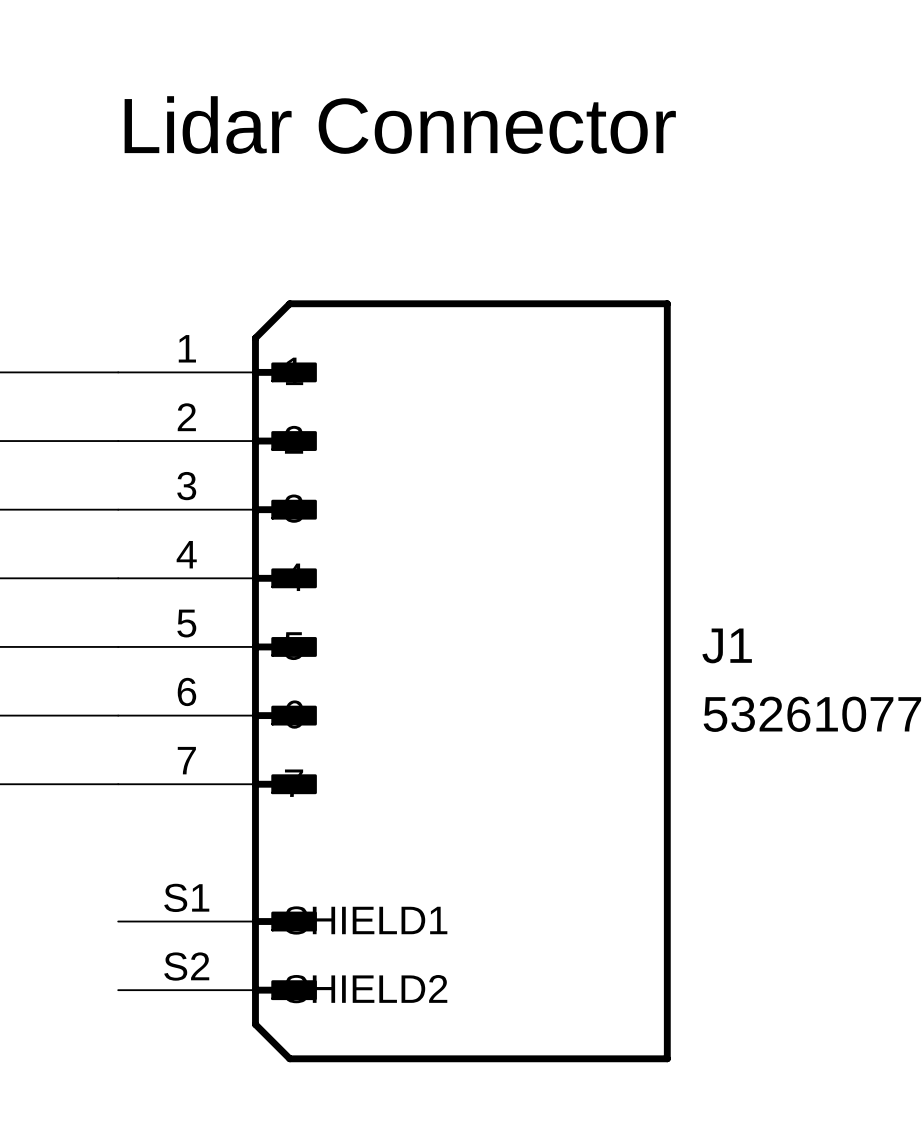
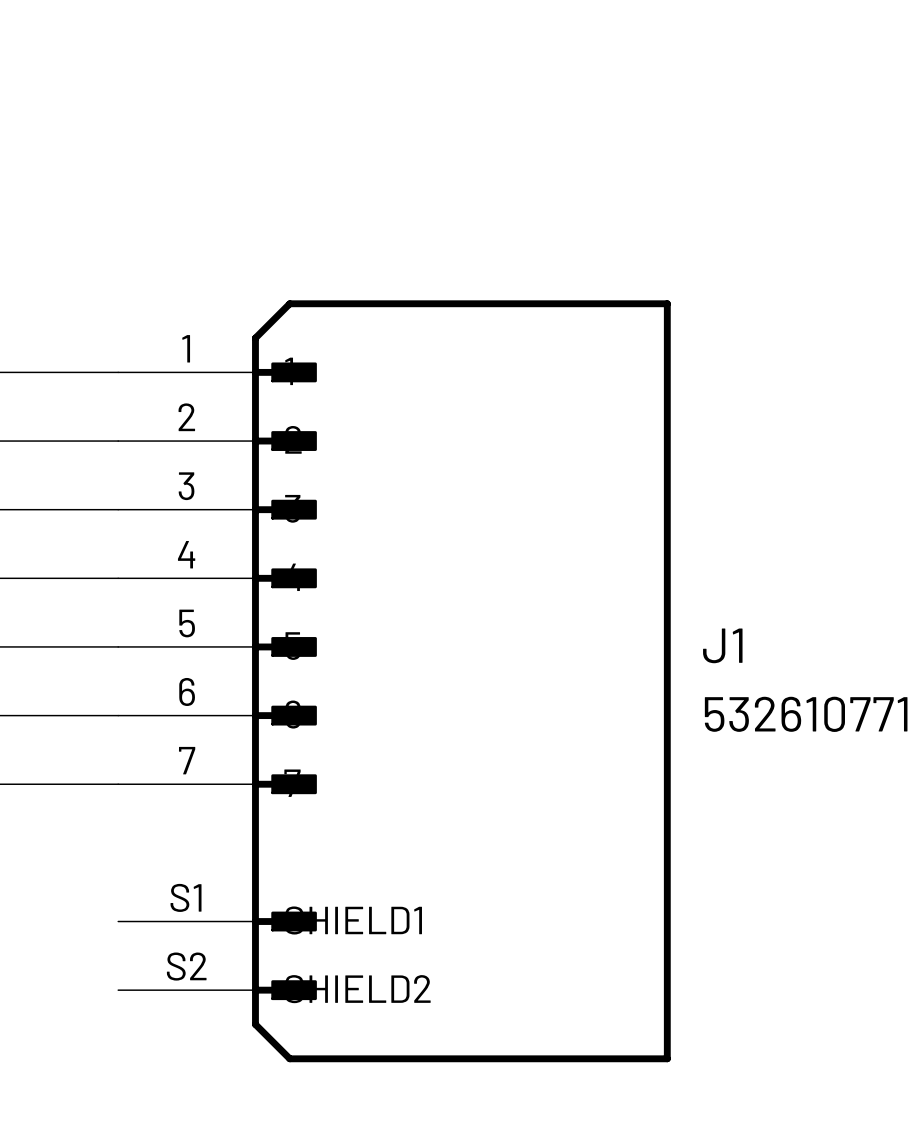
text: Lidar Connector (400, 125) -> none

